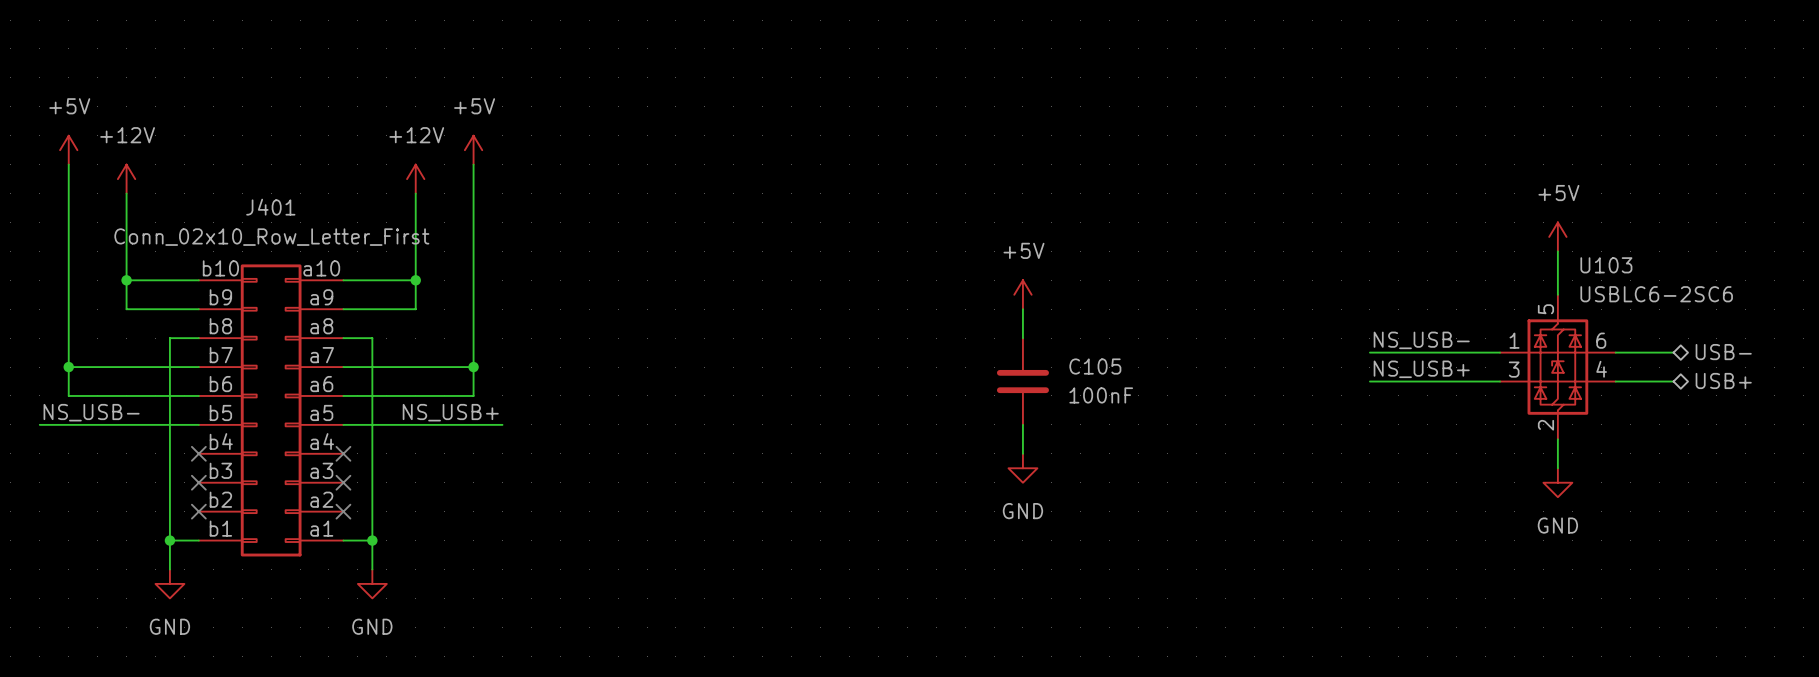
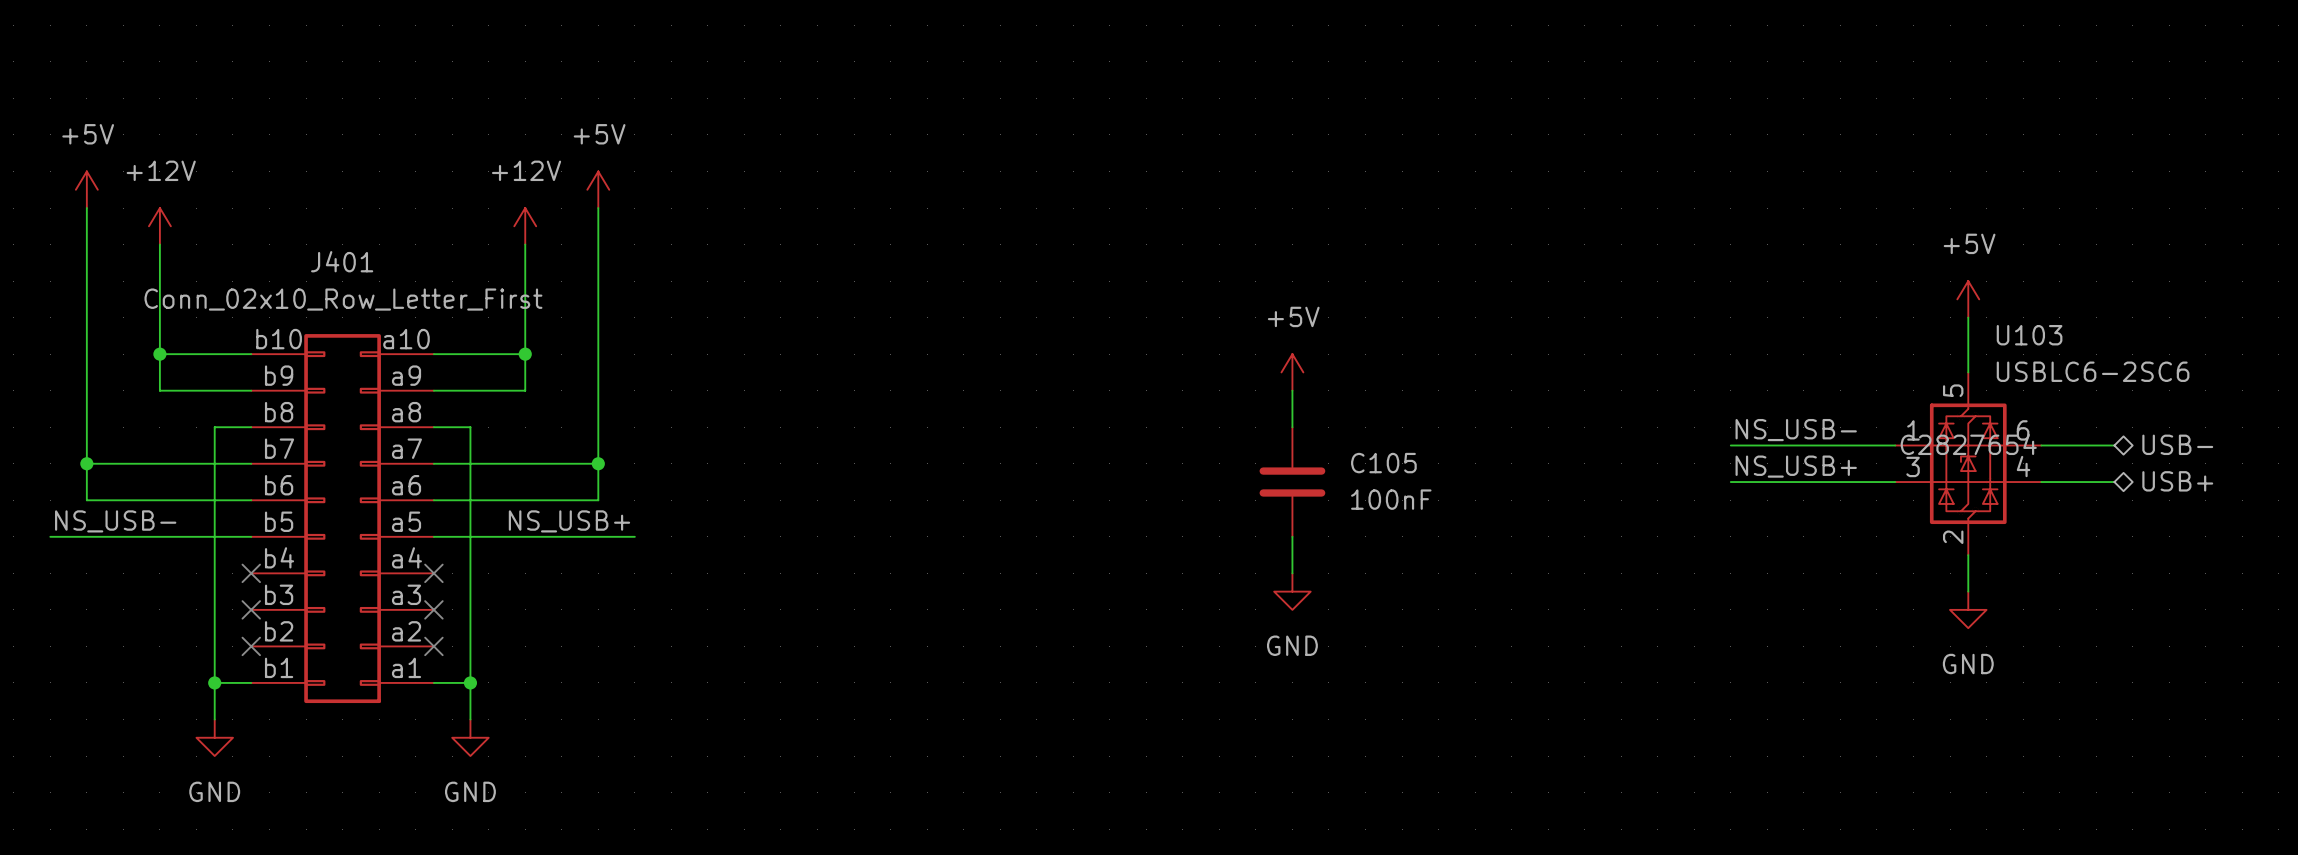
U103 text: none -> C2827654 (1968, 444)

